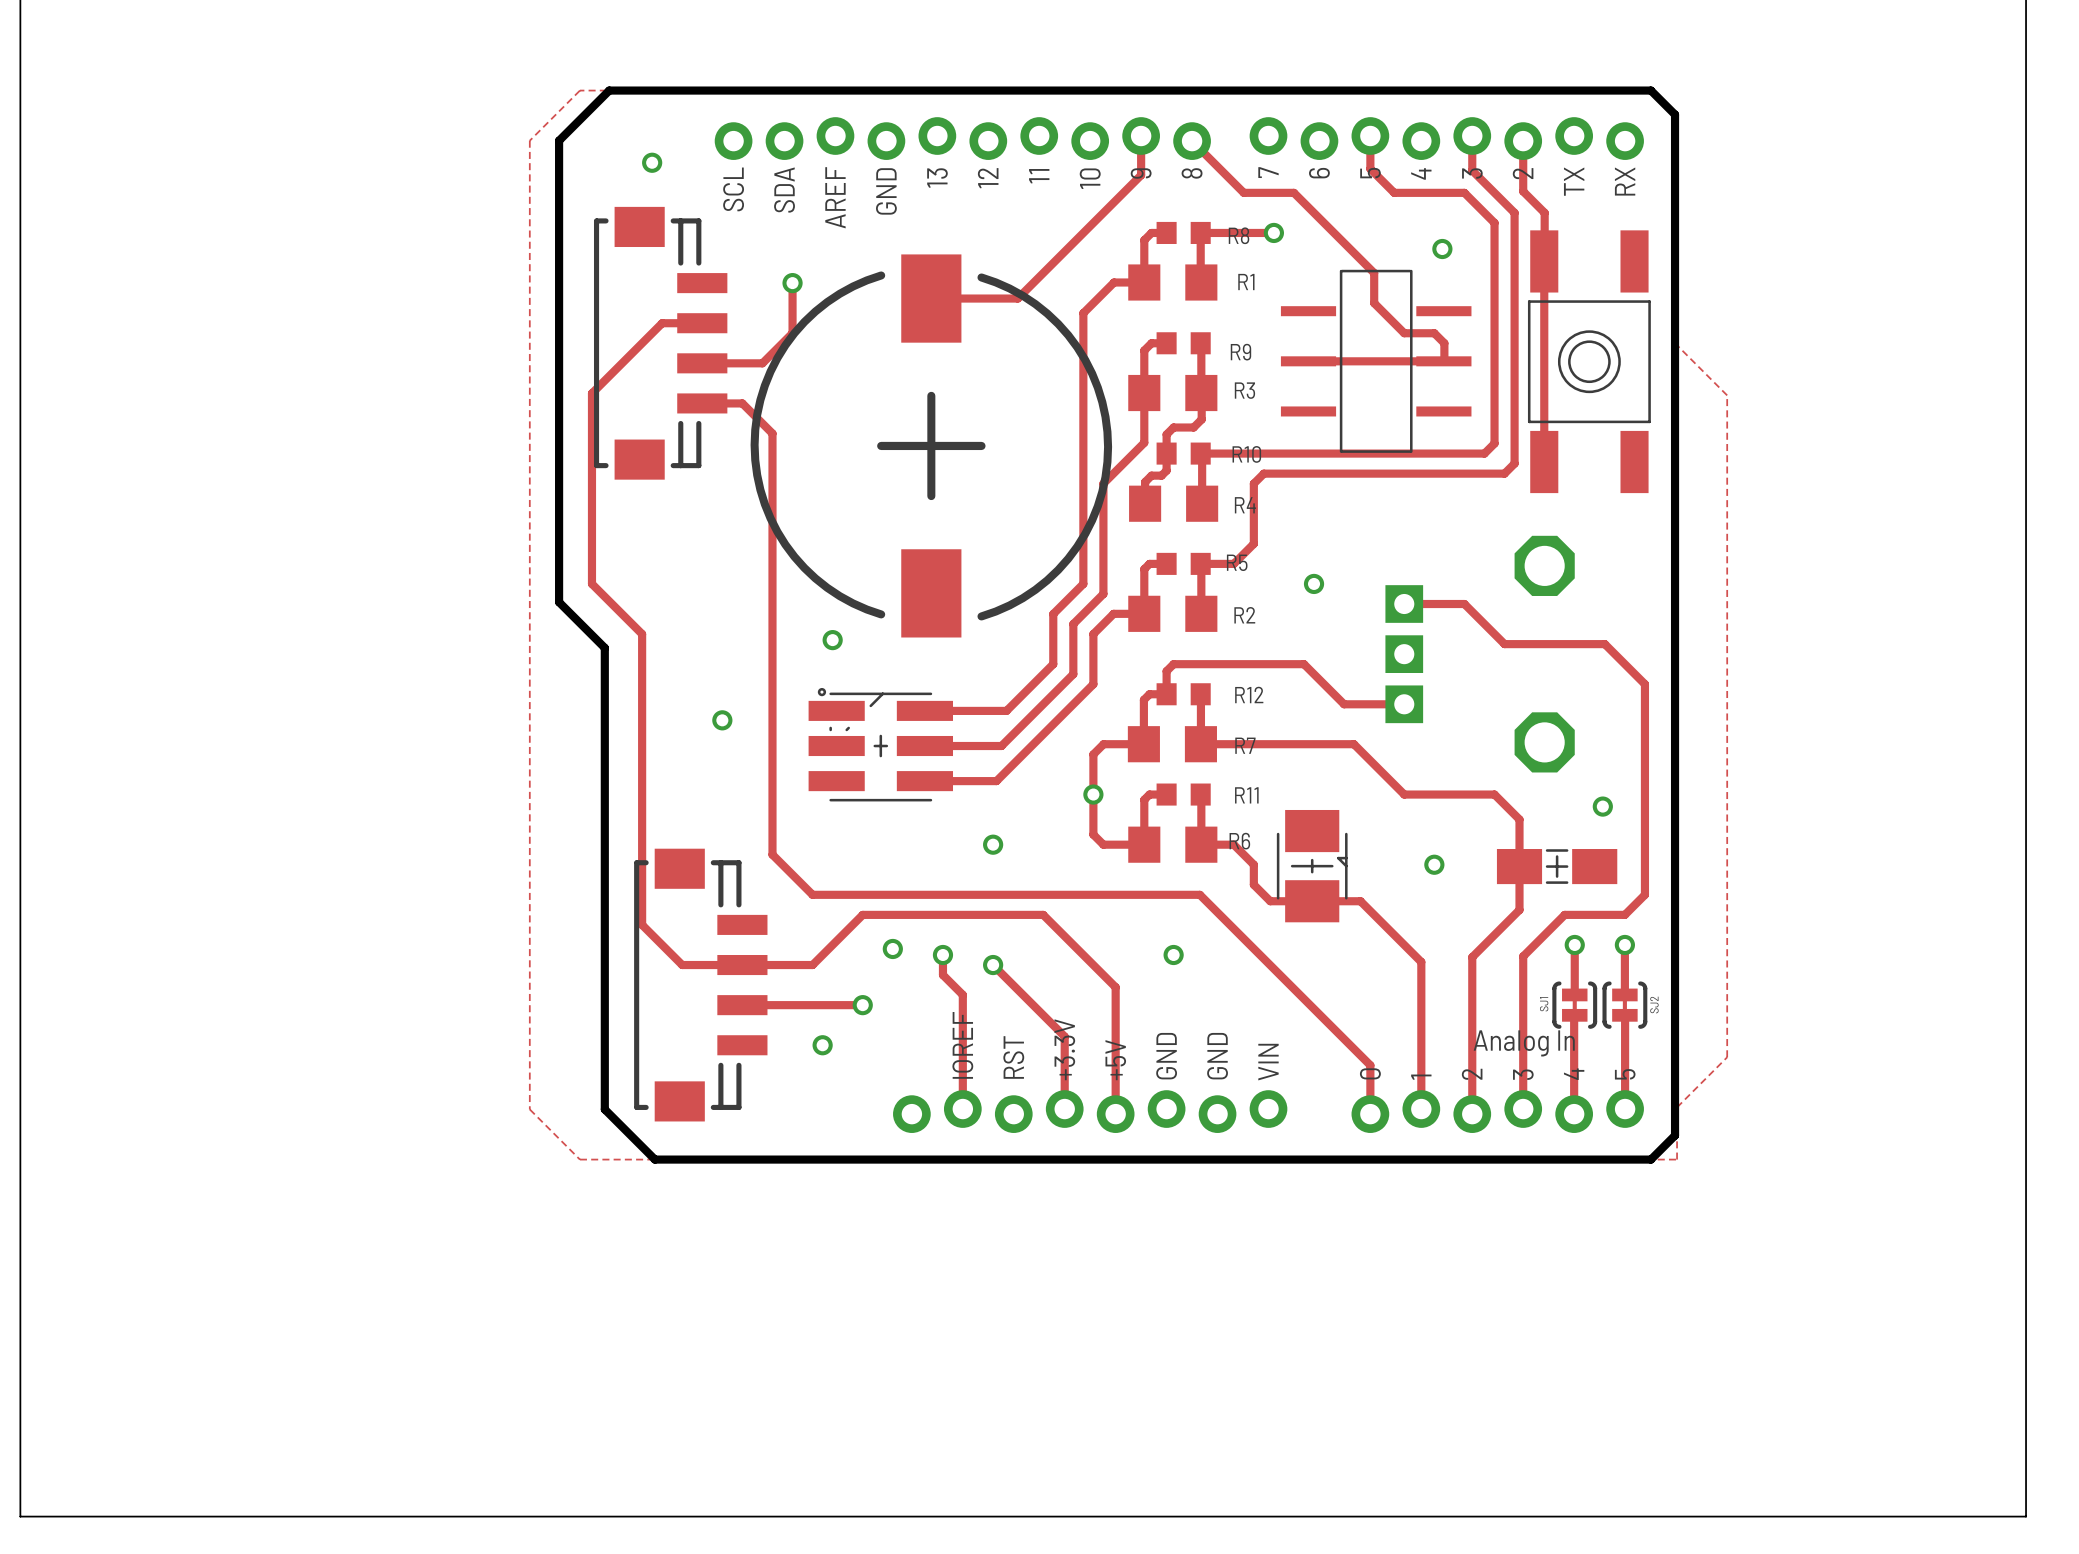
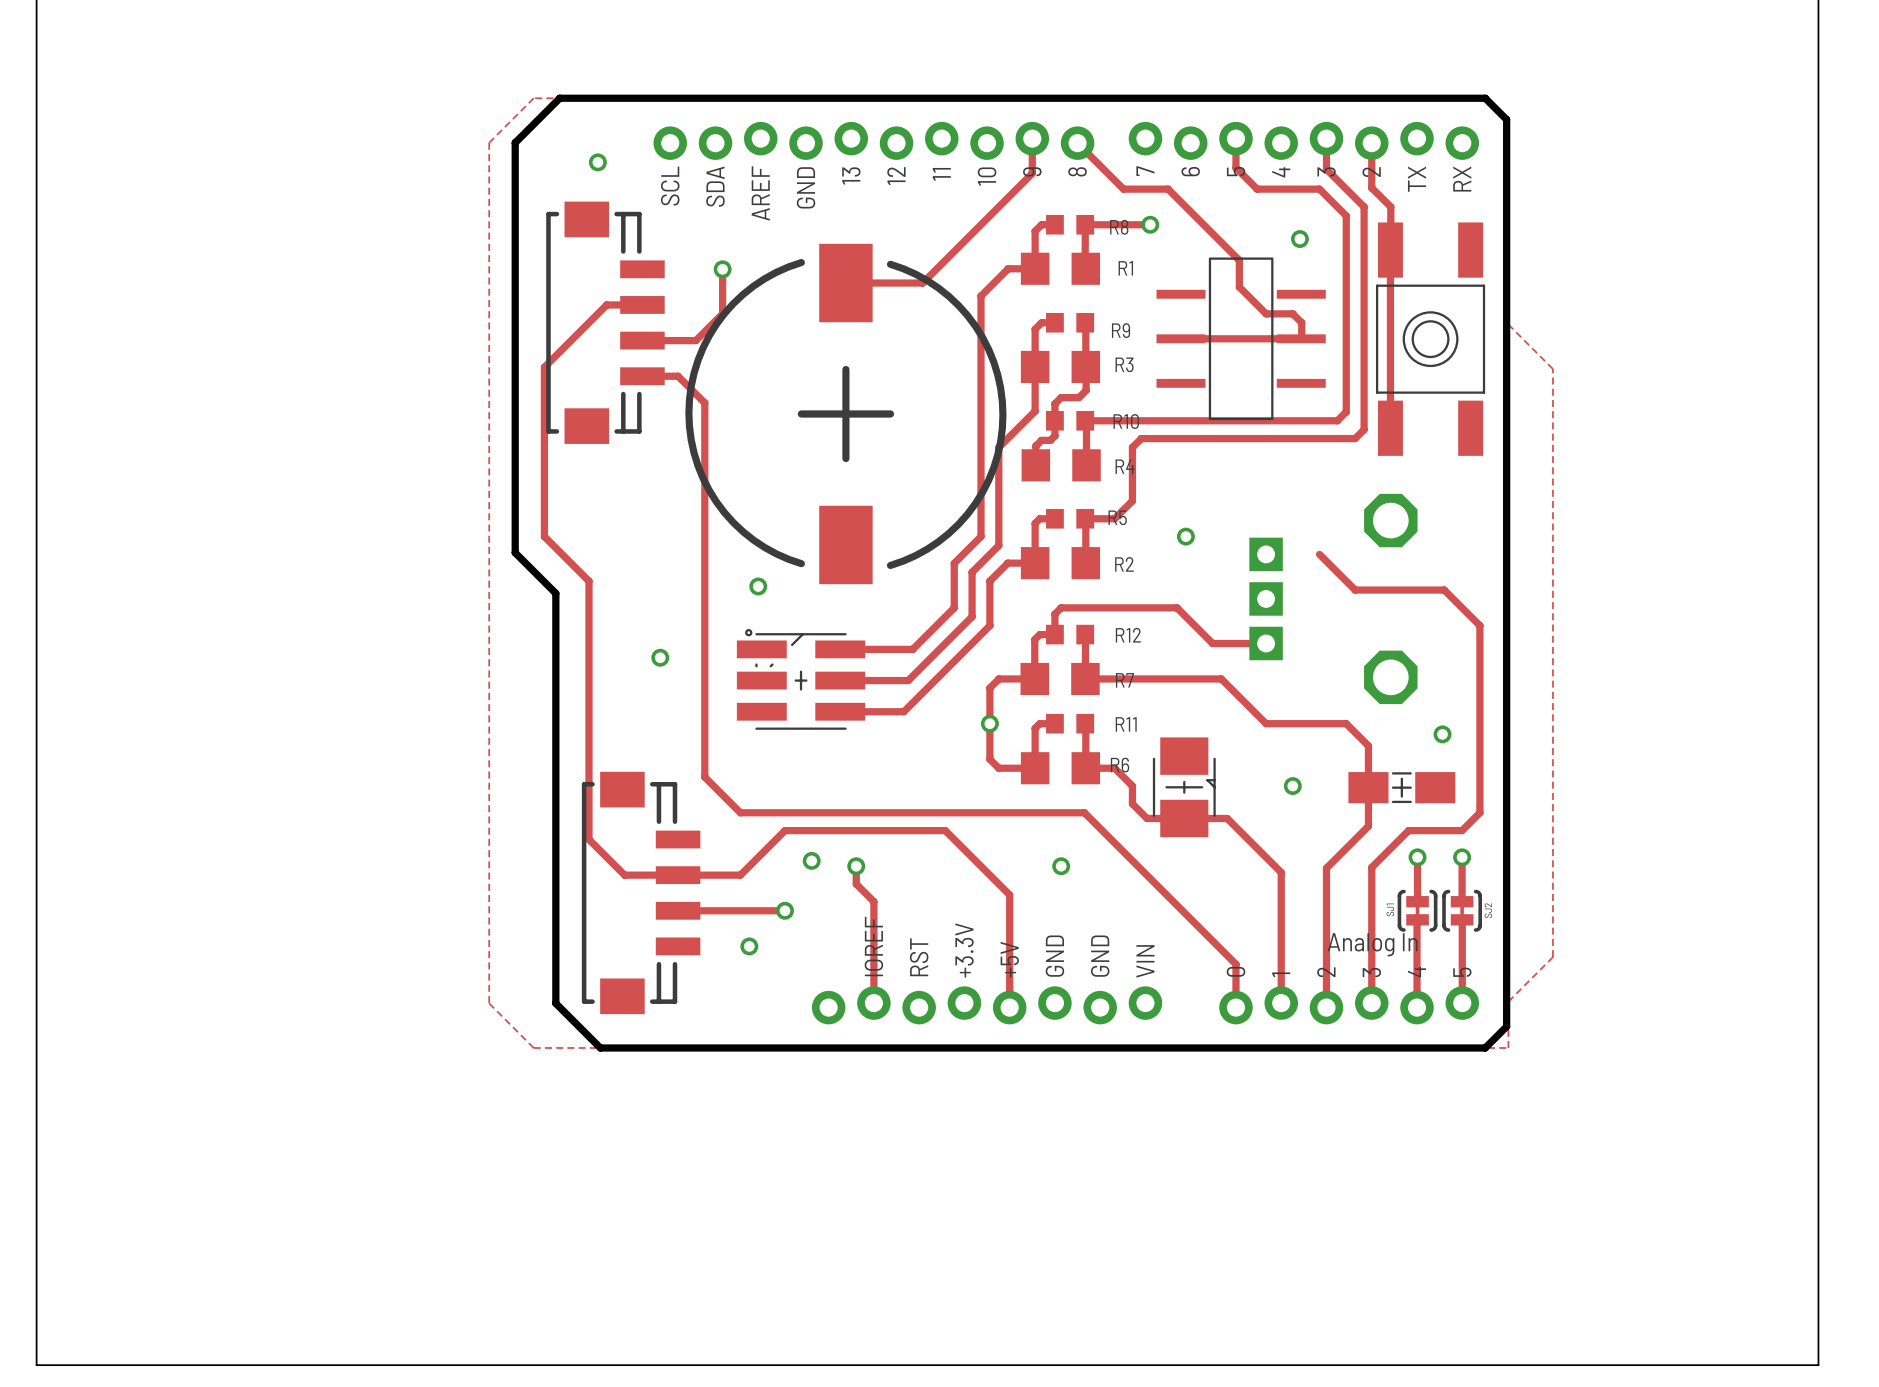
track: (1404, 604) (1464, 604) -> none
via: (993, 844) -> none
track: (993, 965) (1064, 1036) (1064, 1109) -> none
via: (993, 965) -> none

